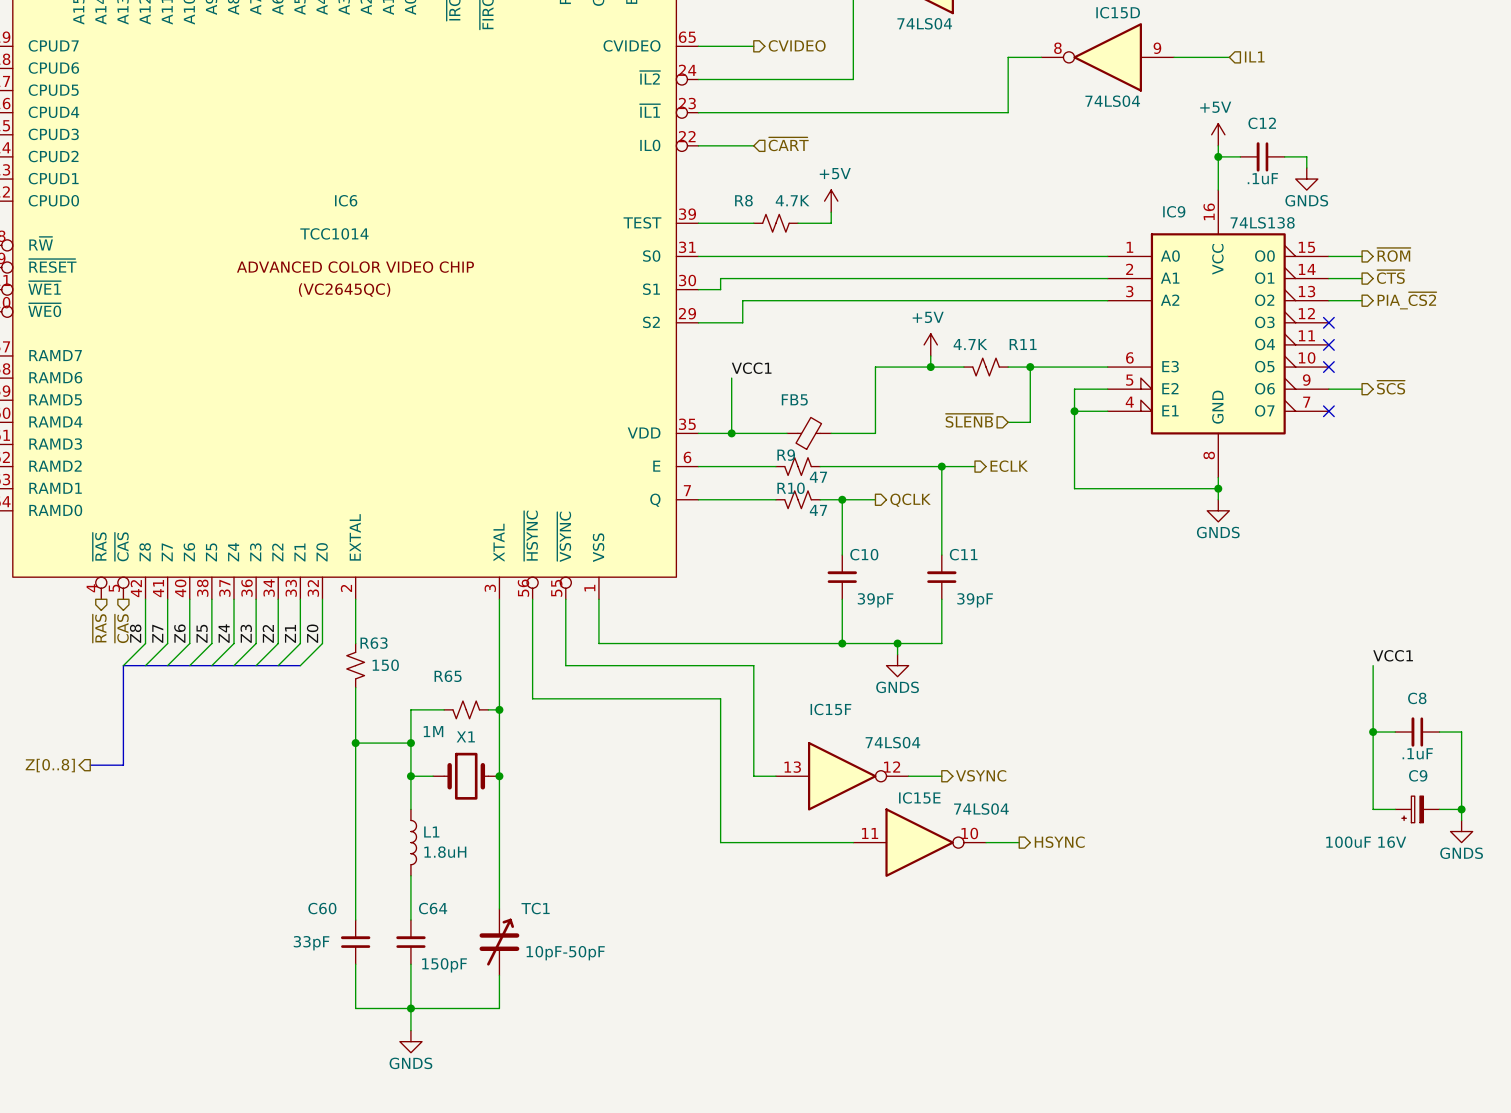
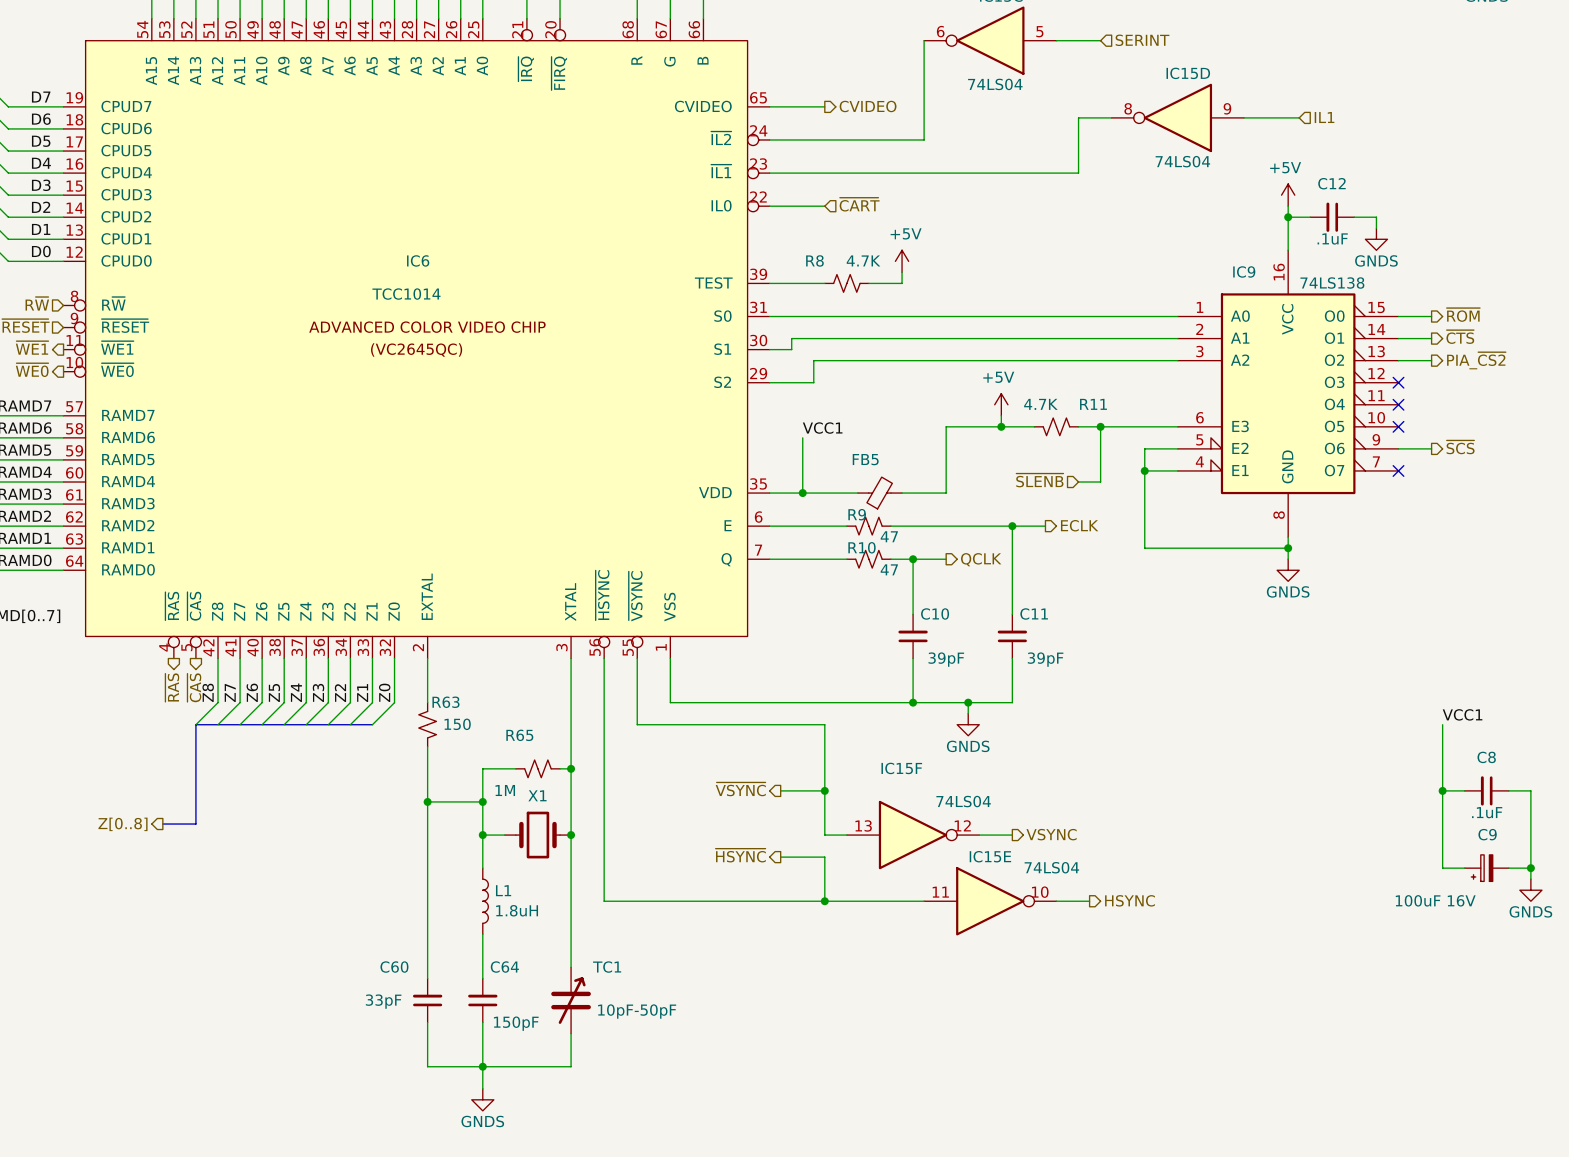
wire: (532, 698) (720, 698) (720, 842) -> (604, 757) (604, 901) (791, 901)
hierarchical label: none -> ~{VSYNC} (740, 789)
wire: none -> (780, 790) (824, 790)
junction: none -> (824, 790)
hierarchical label: none -> ~{HSYNC} (740, 855)
wire: none -> (780, 857) (824, 857) (824, 901)
junction: none -> (824, 901)

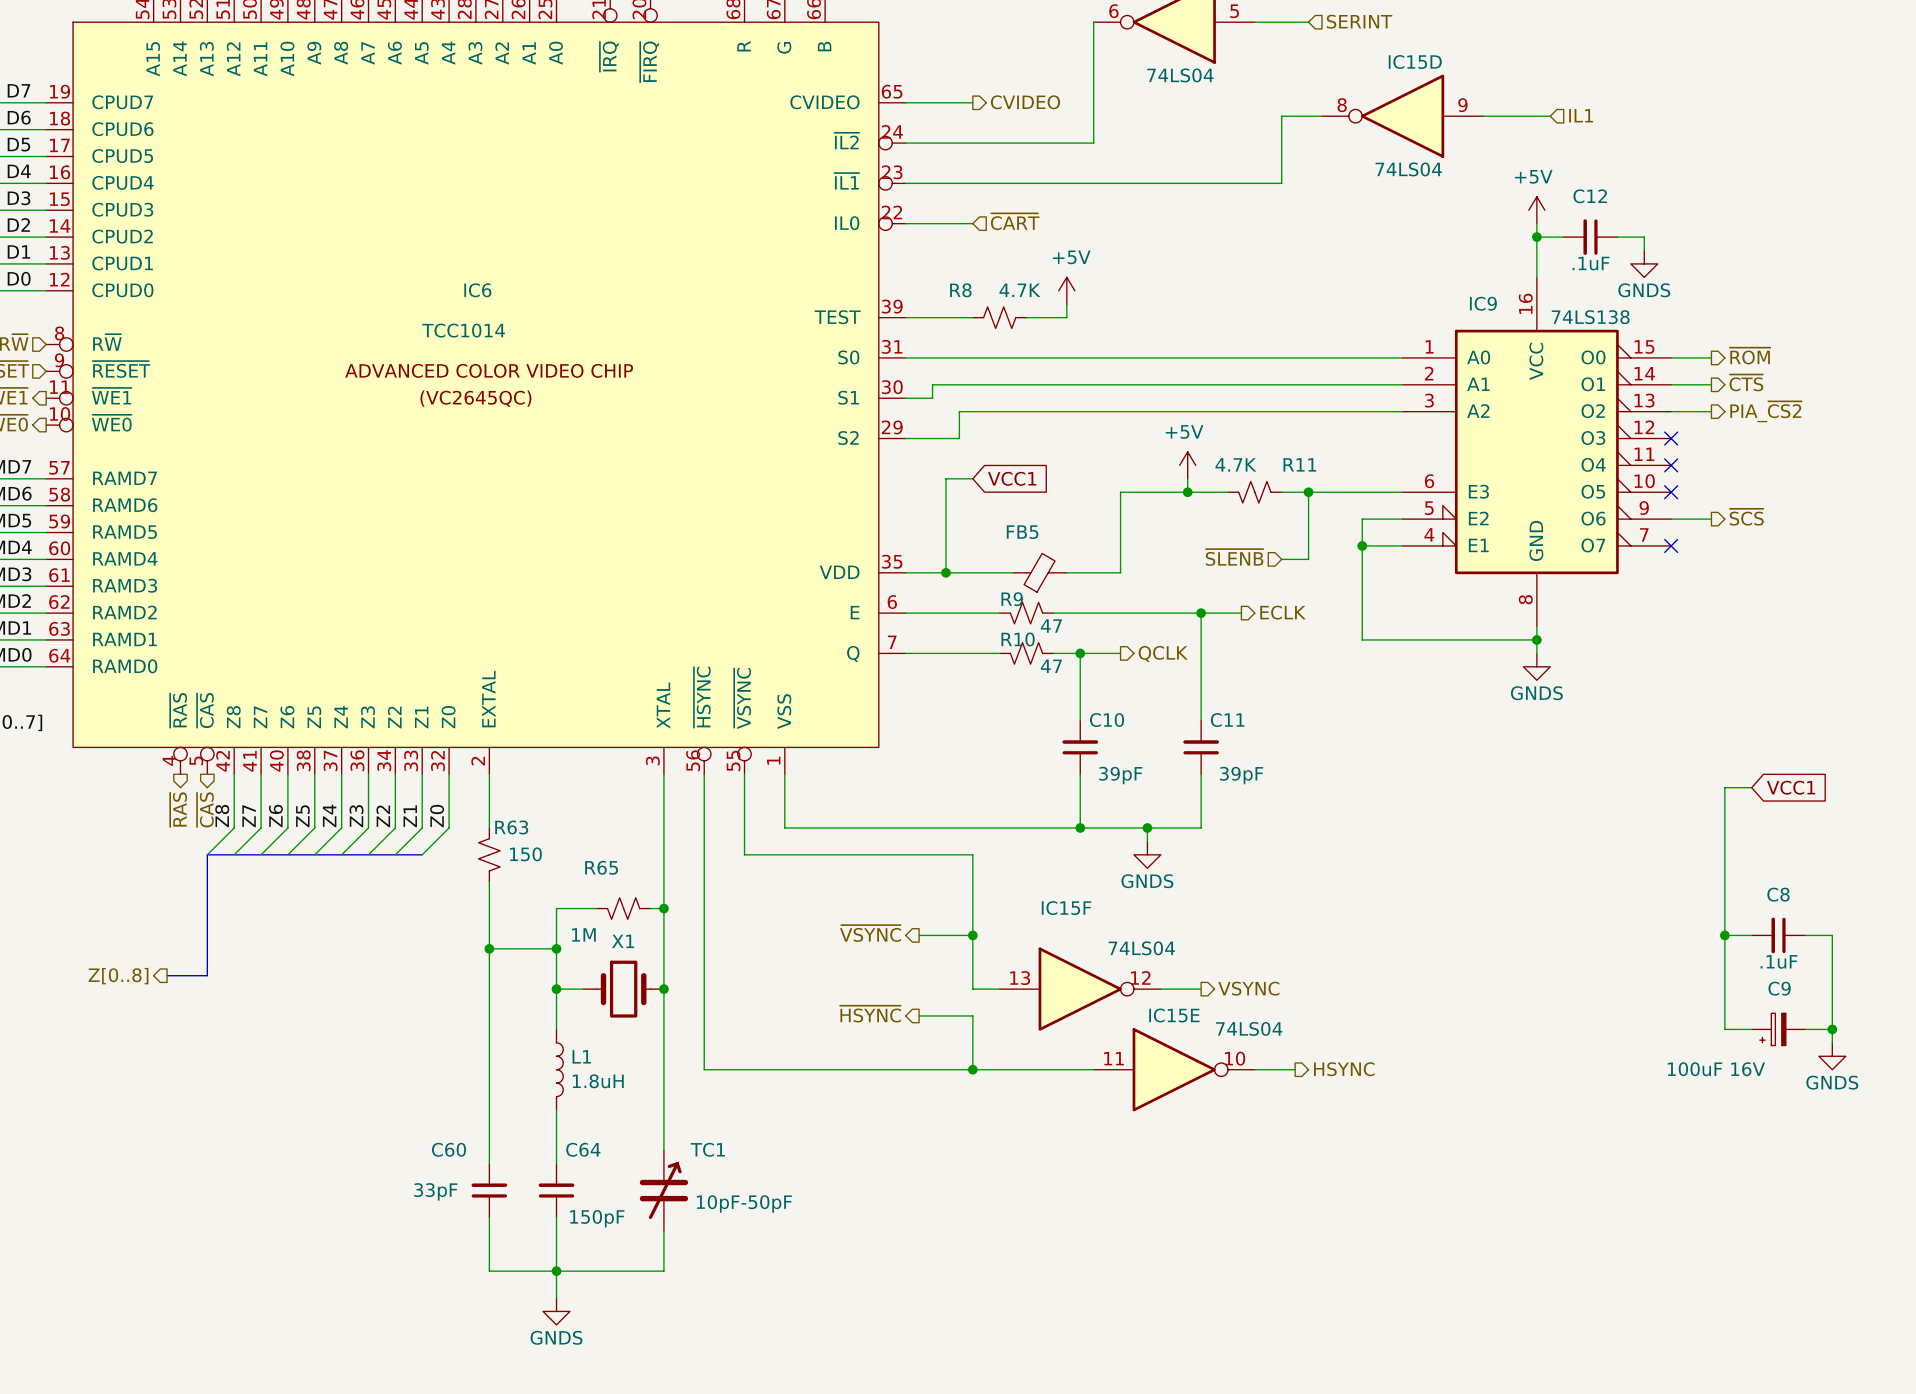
wire: none -> (972, 478) (945, 478) (945, 505)
global label: none -> VCC1 (1012, 478)
label: VCC1 (822, 428) -> none
wire: none -> (1751, 787) (1724, 787) (1724, 854)
global label: none -> VCC1 (1791, 787)
label: VCC1 (1462, 714) -> none

